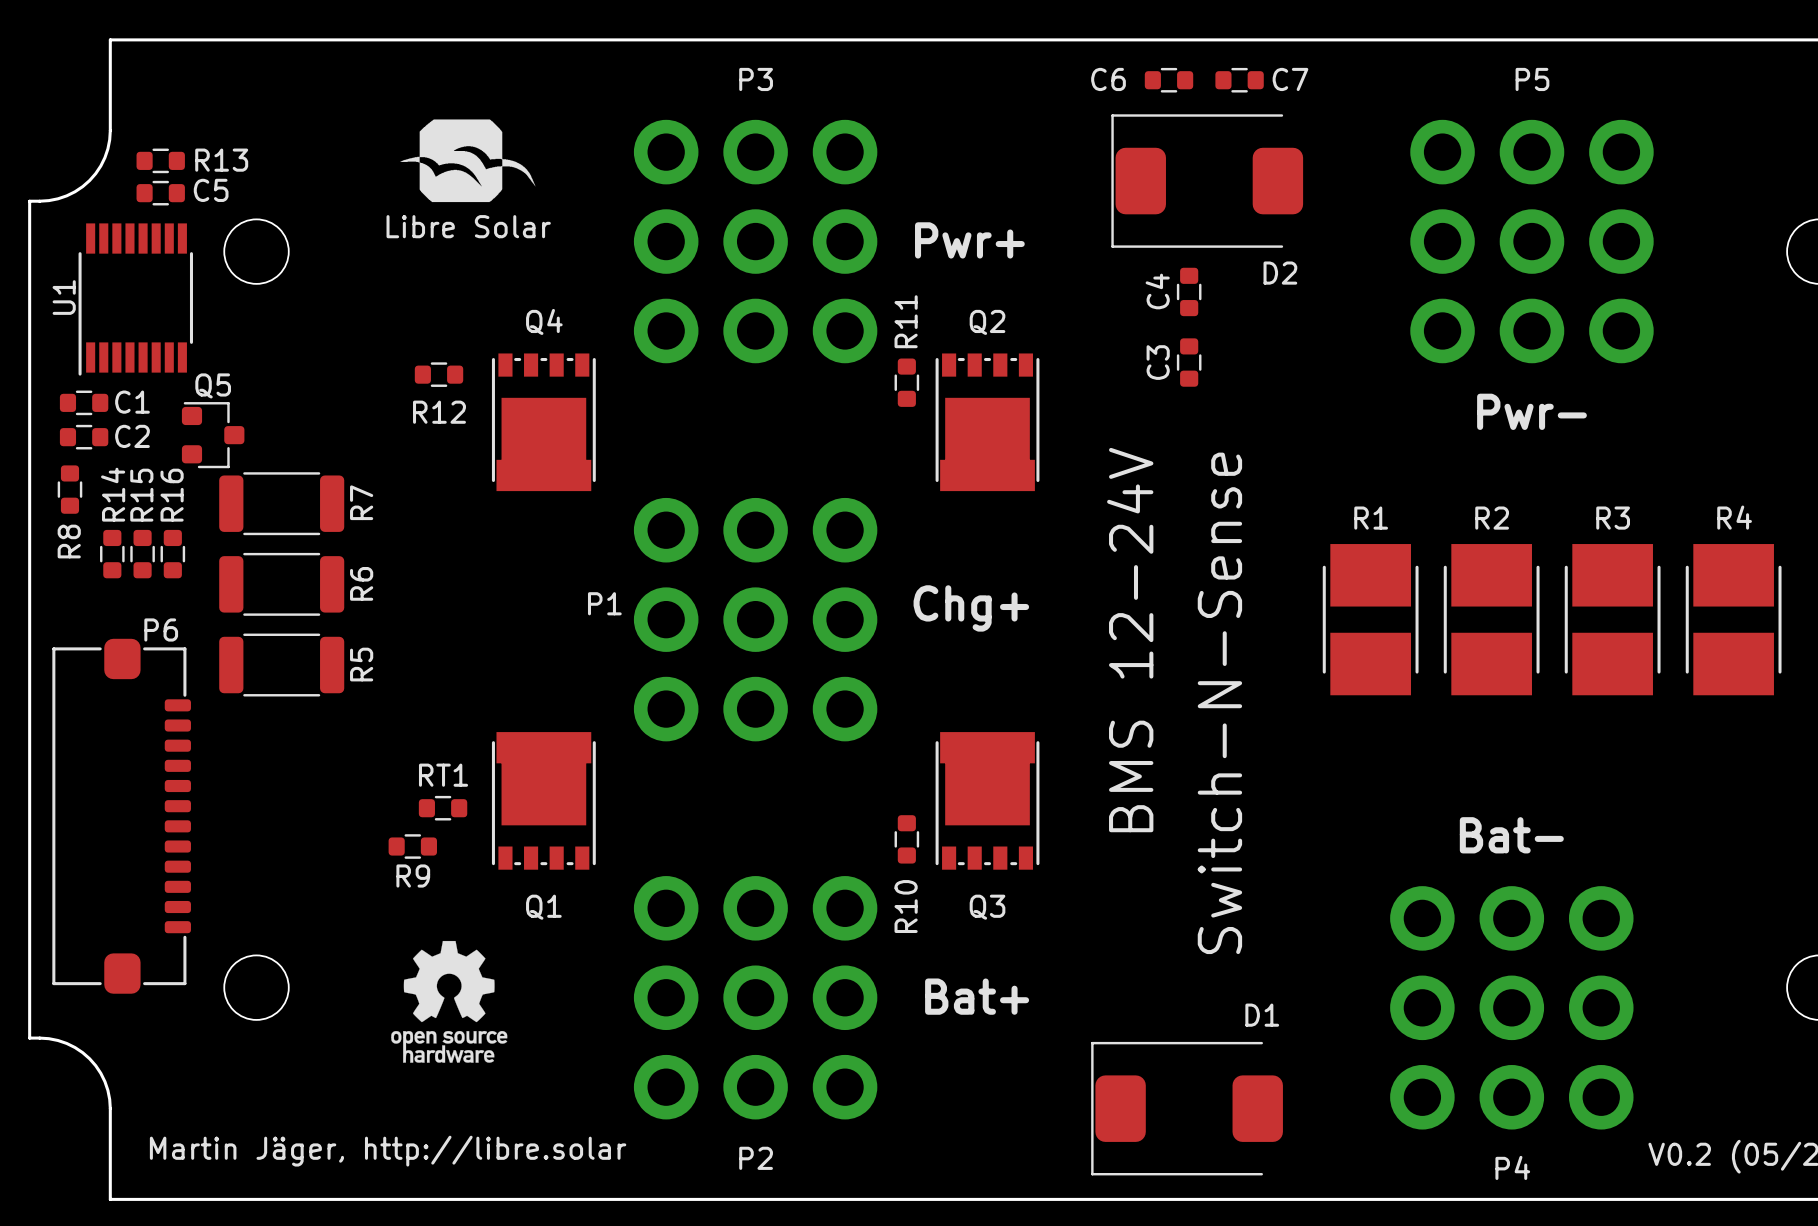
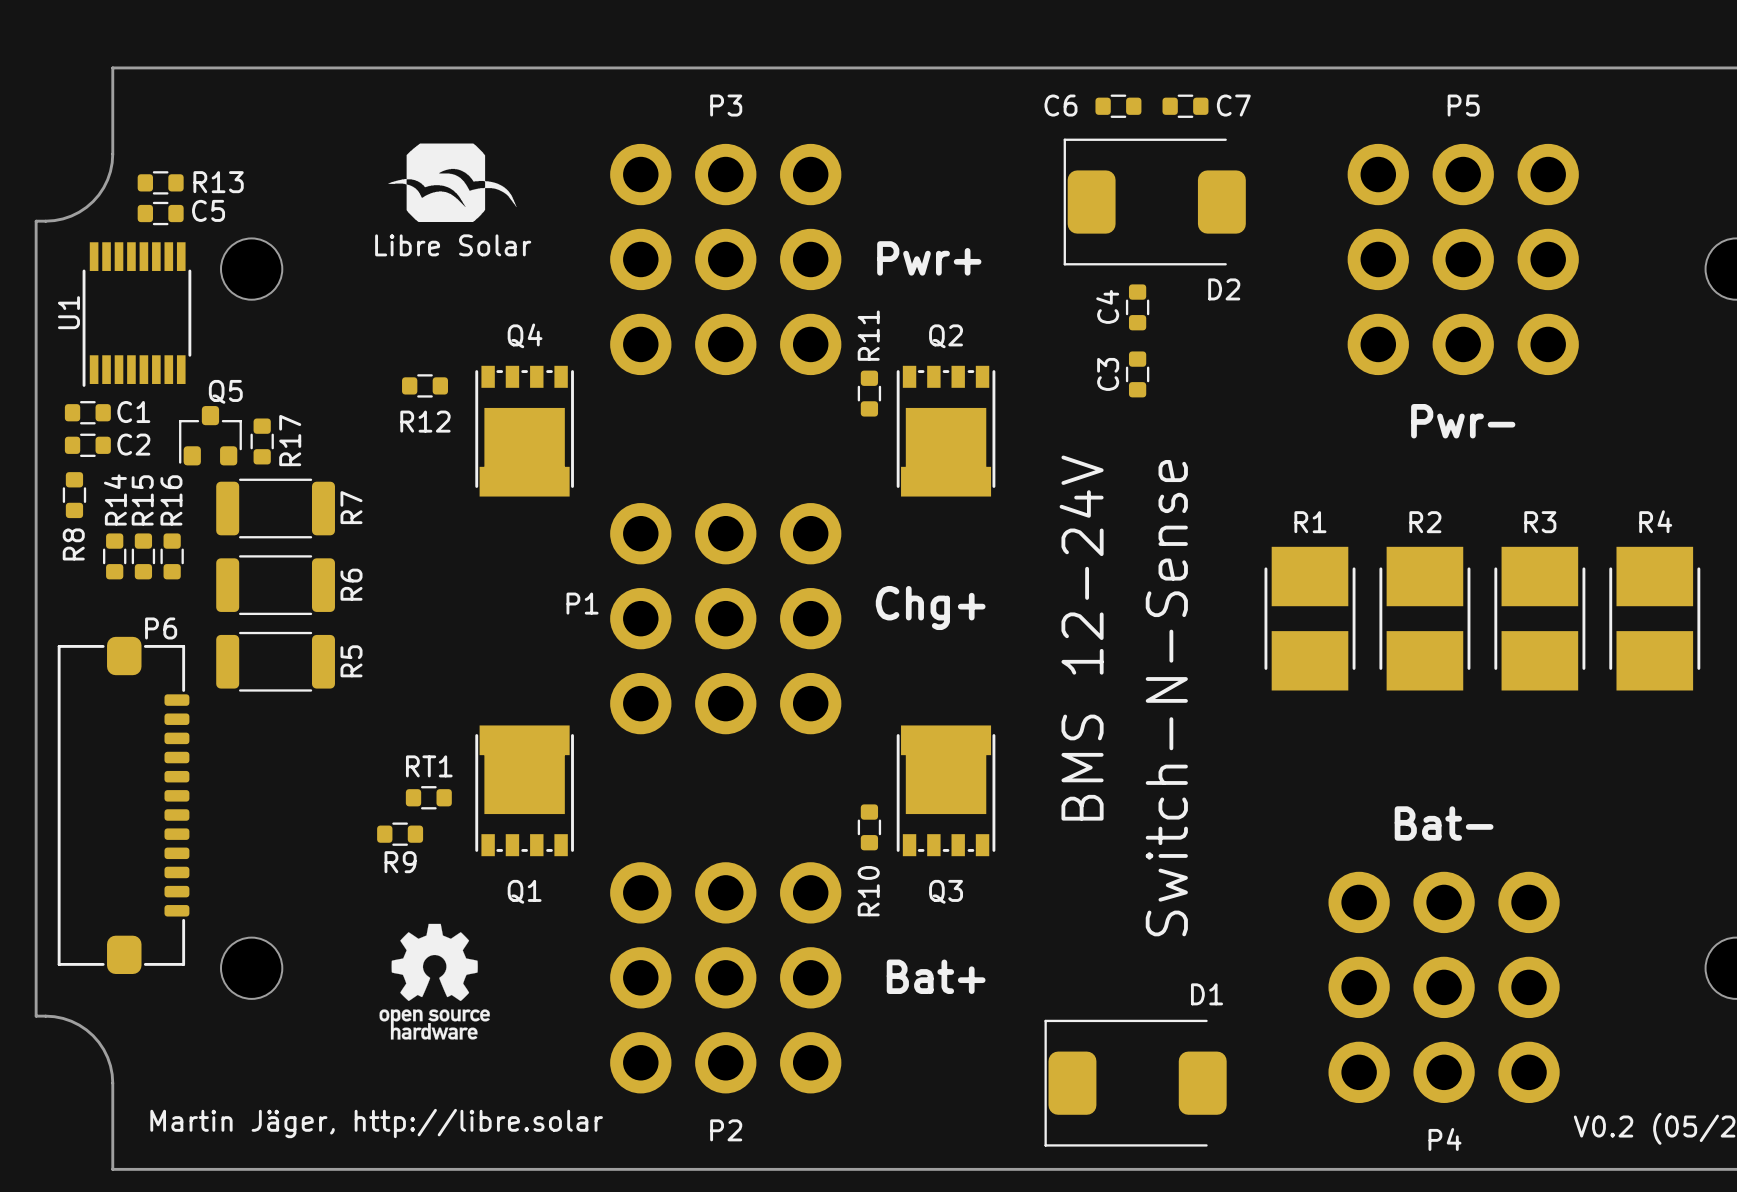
R17: none -> (262, 441)
Q5 rotation: 0° (213, 435) -> 90° counterclockwise (210, 435)

